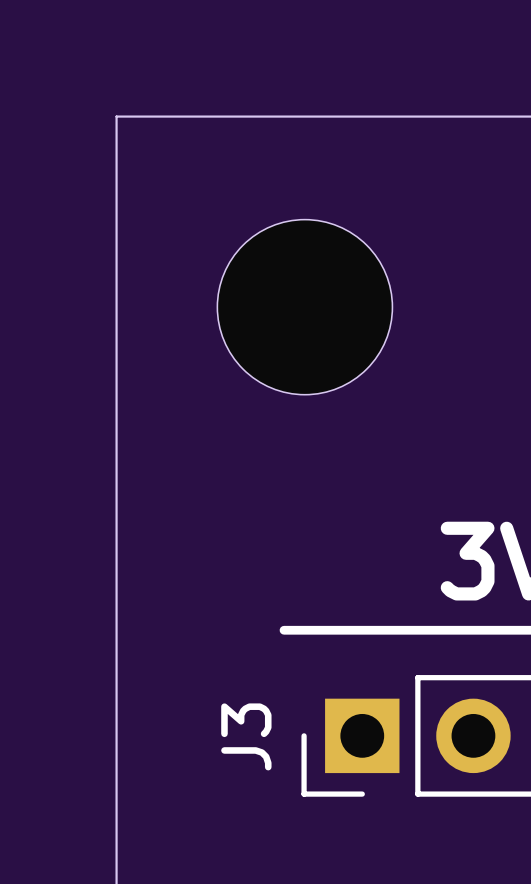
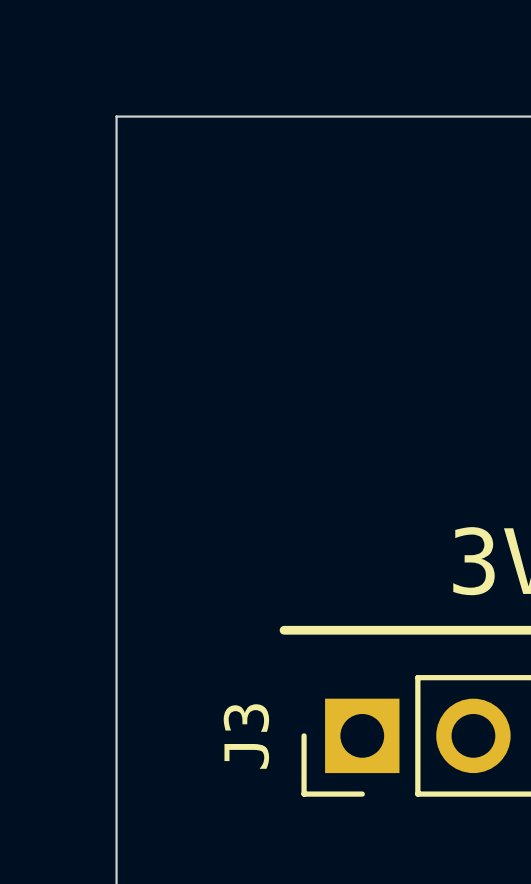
part: (304, 307) -> none

